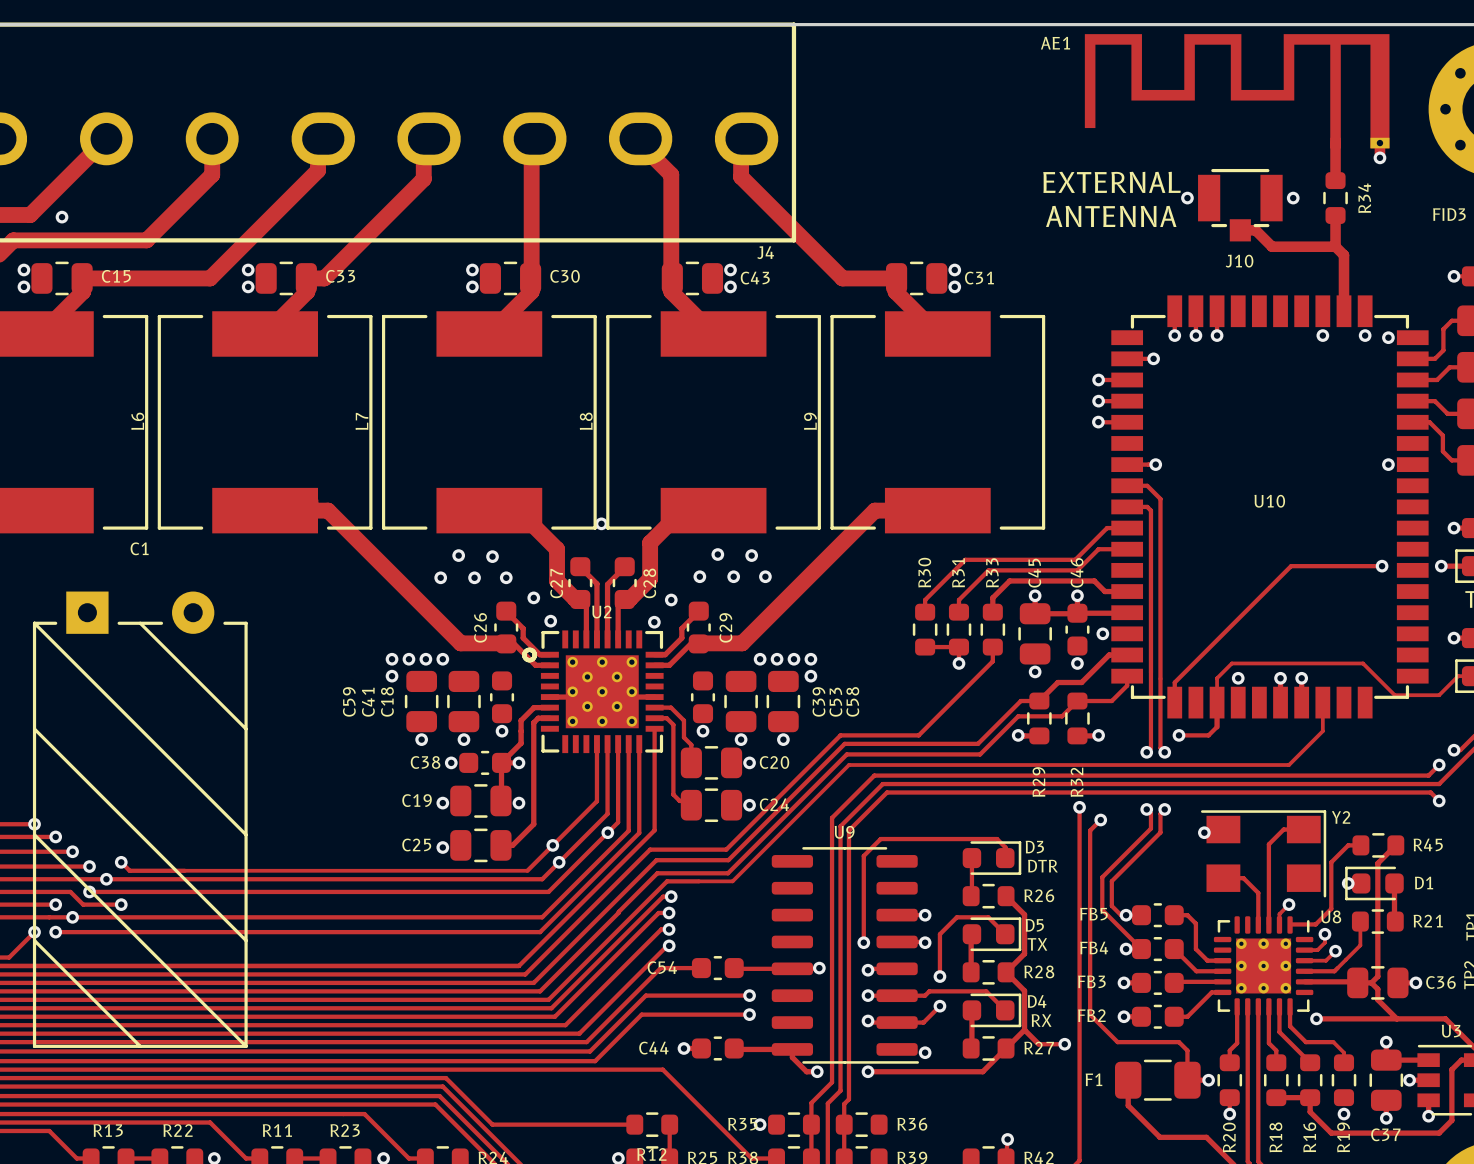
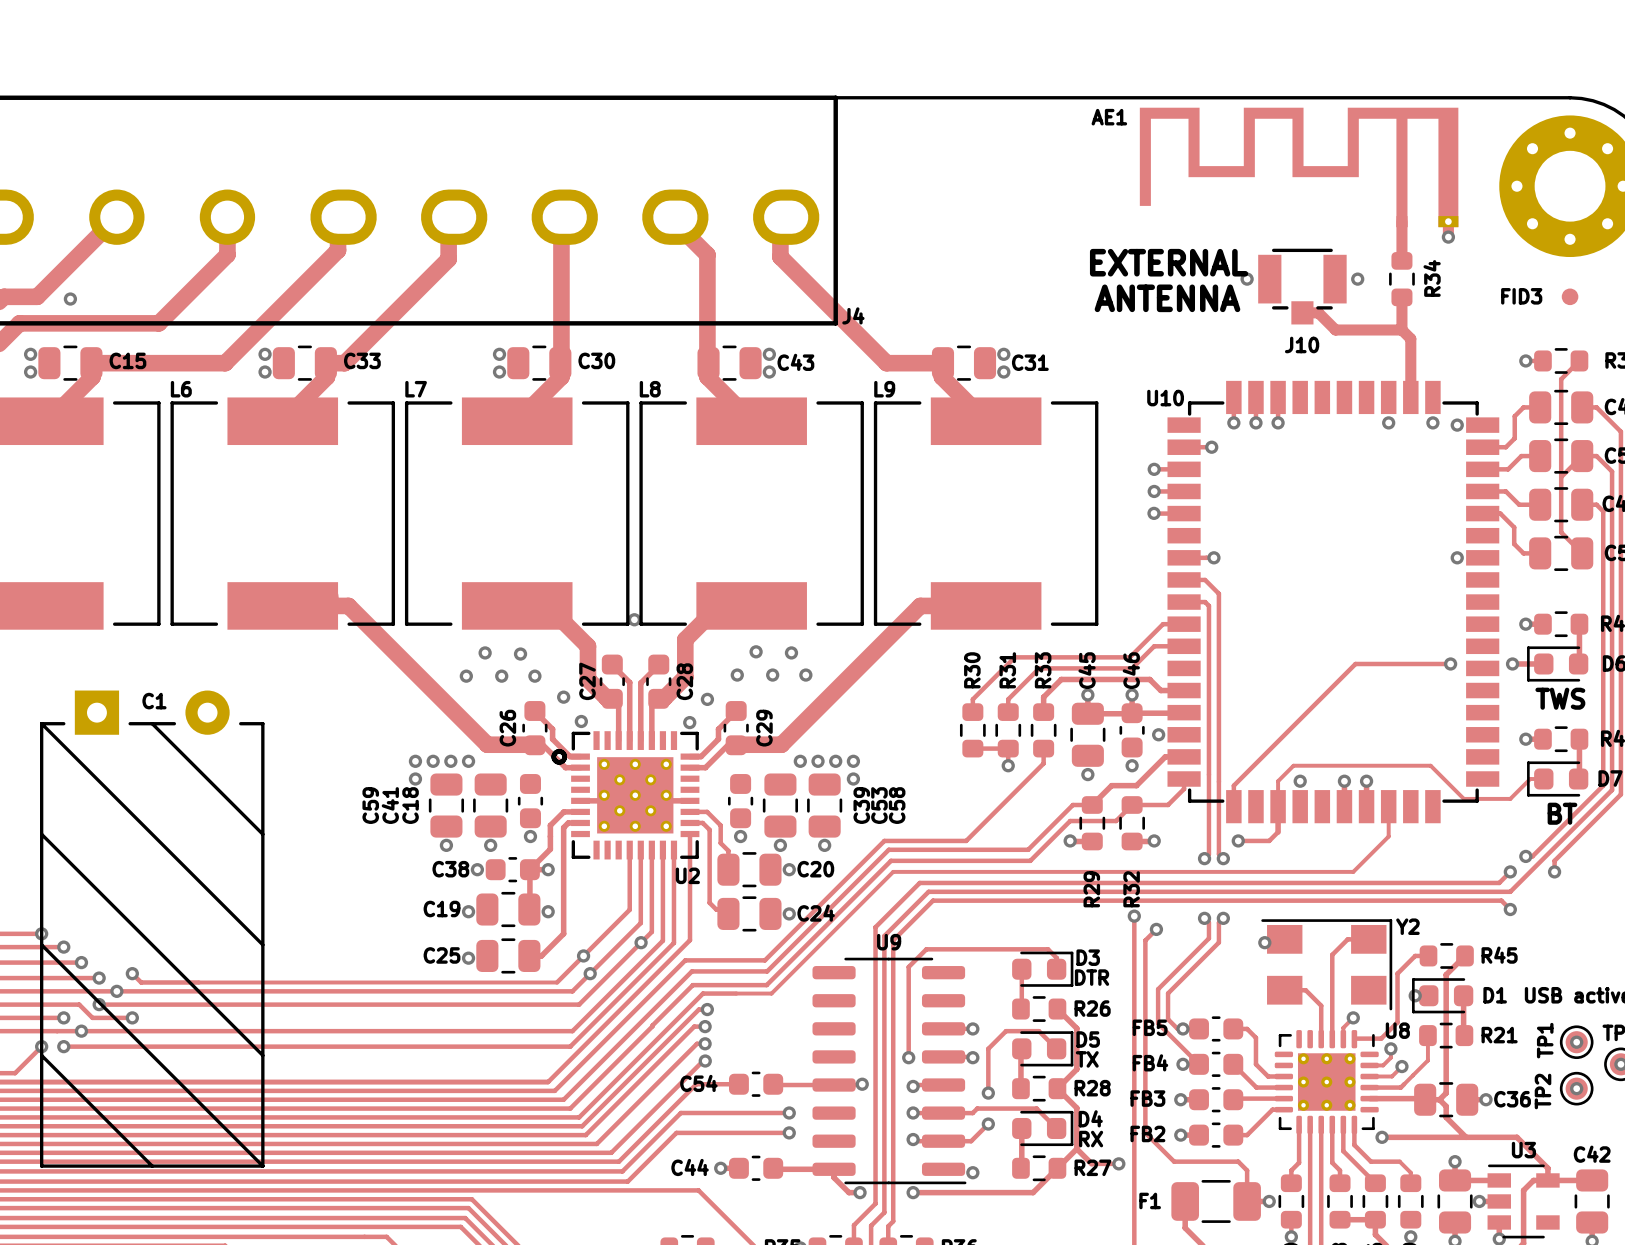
J4 name position: J4 (765, 252) -> J4 (853, 315)
L6 name rotation: 0° (137, 421) -> 90° clockwise (181, 389)
L6 name position: L6 (137, 421) -> L6 (181, 389)
L7 name rotation: 0° (361, 421) -> 90° clockwise (416, 389)
L7 name position: L7 (361, 421) -> L7 (416, 389)
L8 name rotation: 0° (586, 421) -> 90° clockwise (650, 389)
L8 name position: L8 (586, 421) -> L8 (650, 389)
L9 name rotation: 0° (810, 421) -> 90° clockwise (884, 389)
L9 name position: L9 (810, 421) -> L9 (884, 389)
U10 name position: U10 (1269, 501) -> U10 (1165, 398)
C1 name position: C1 (139, 548) -> C1 (154, 701)
U2 name position: U2 (601, 612) -> U2 (687, 875)

